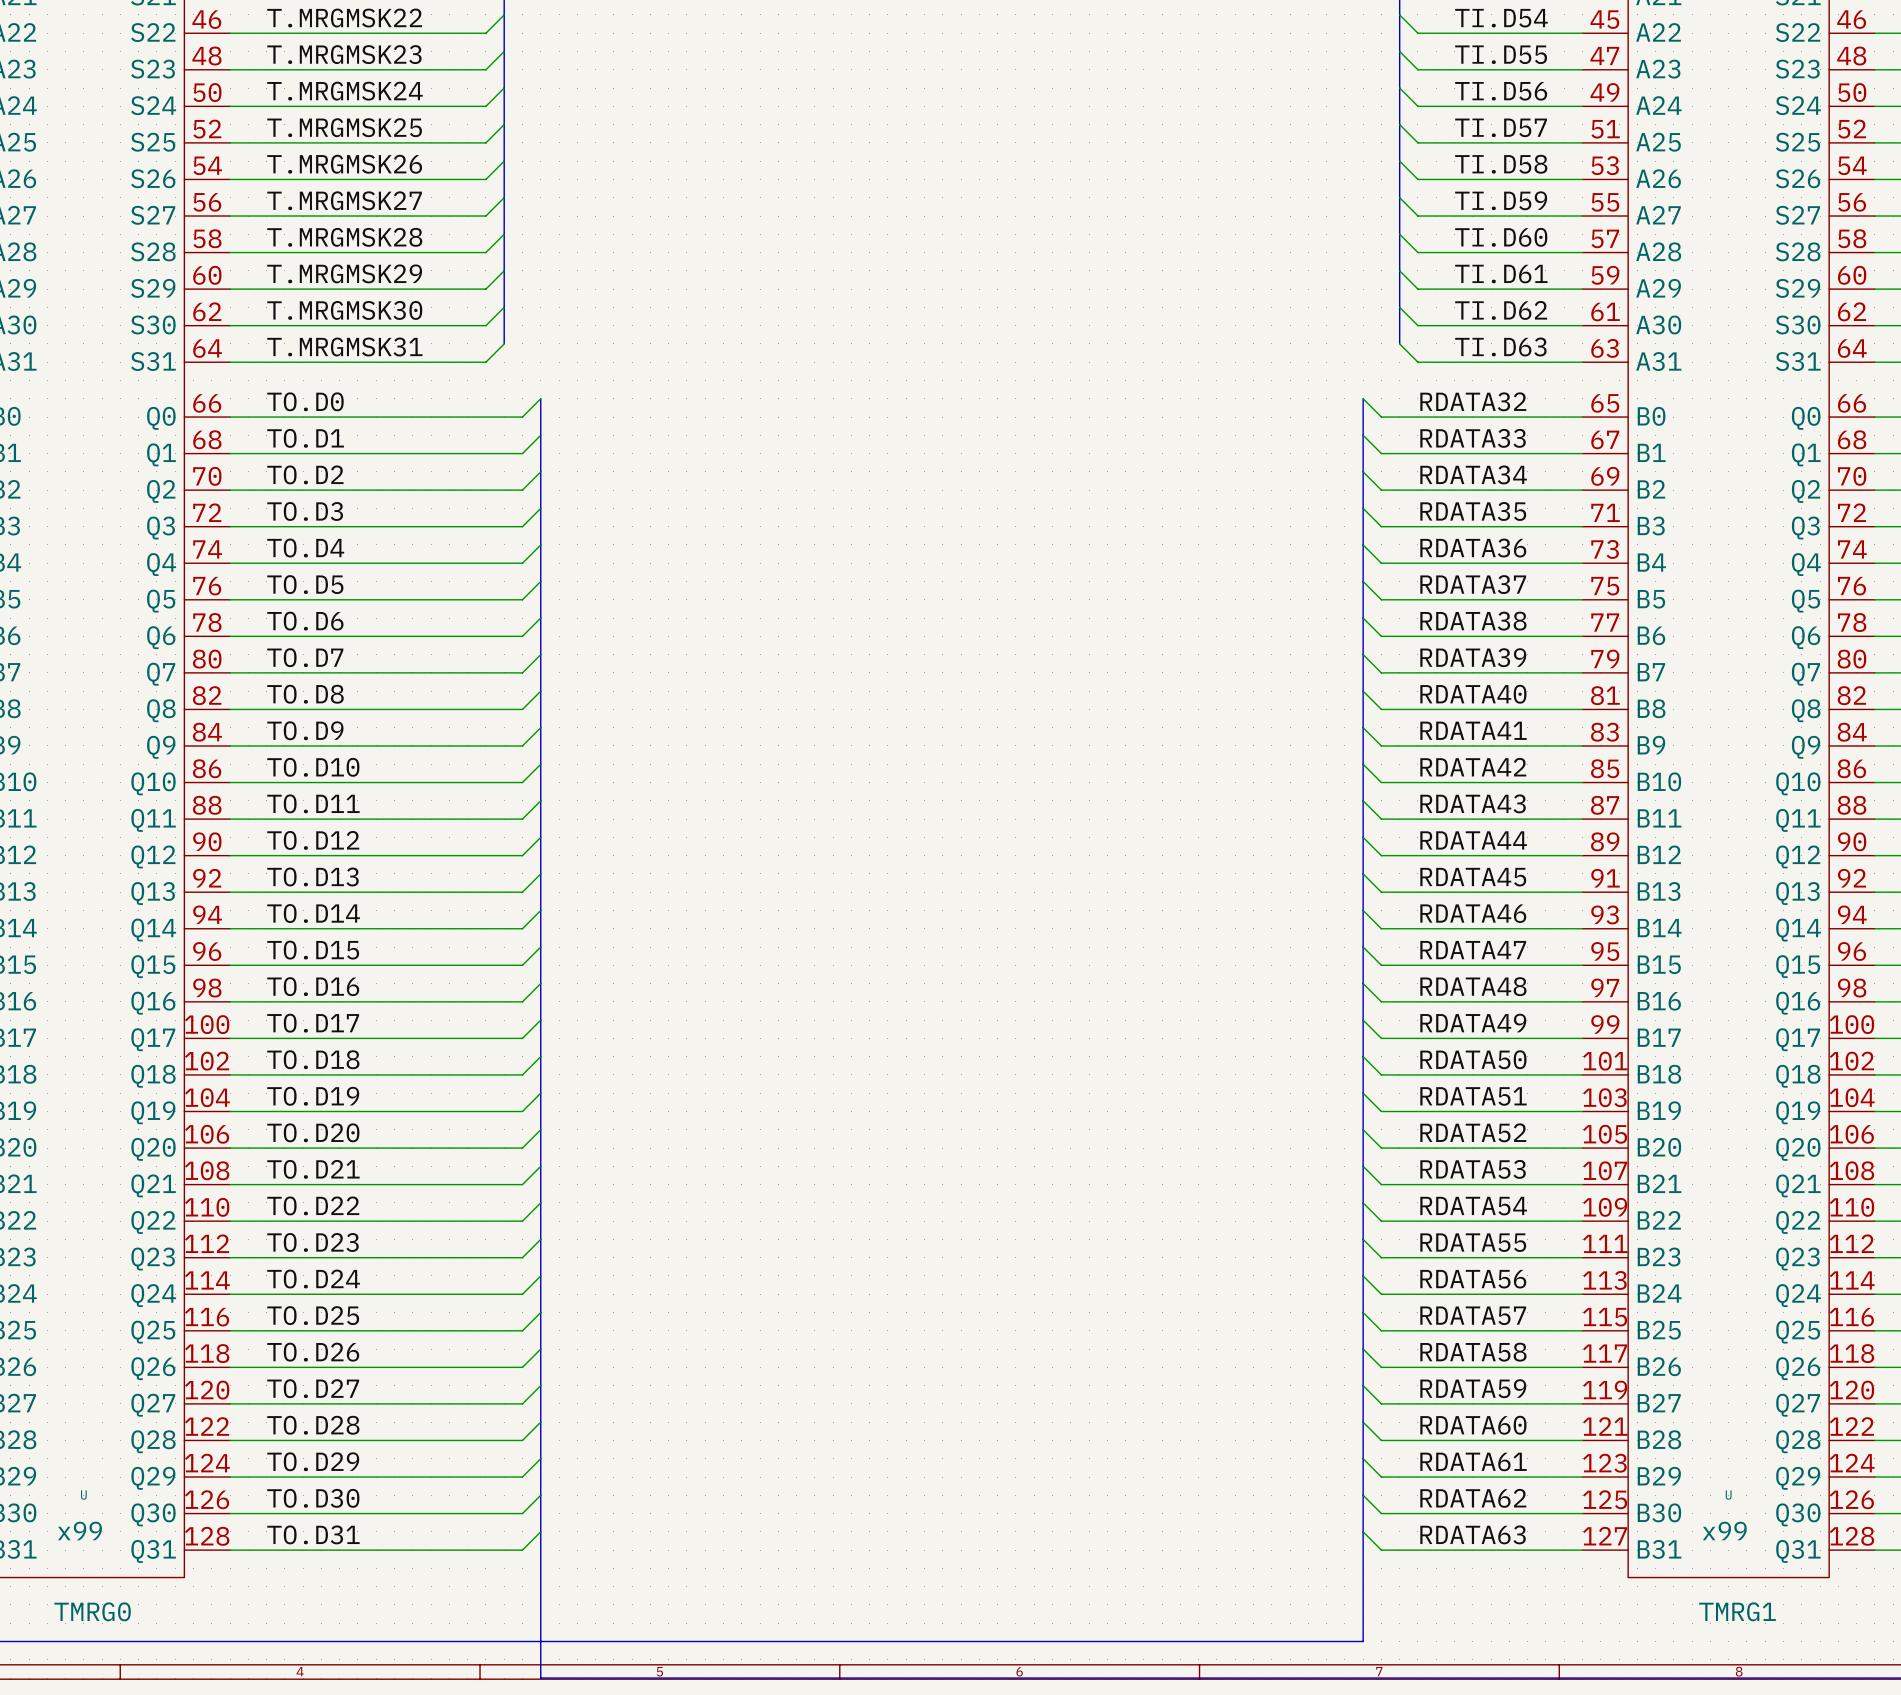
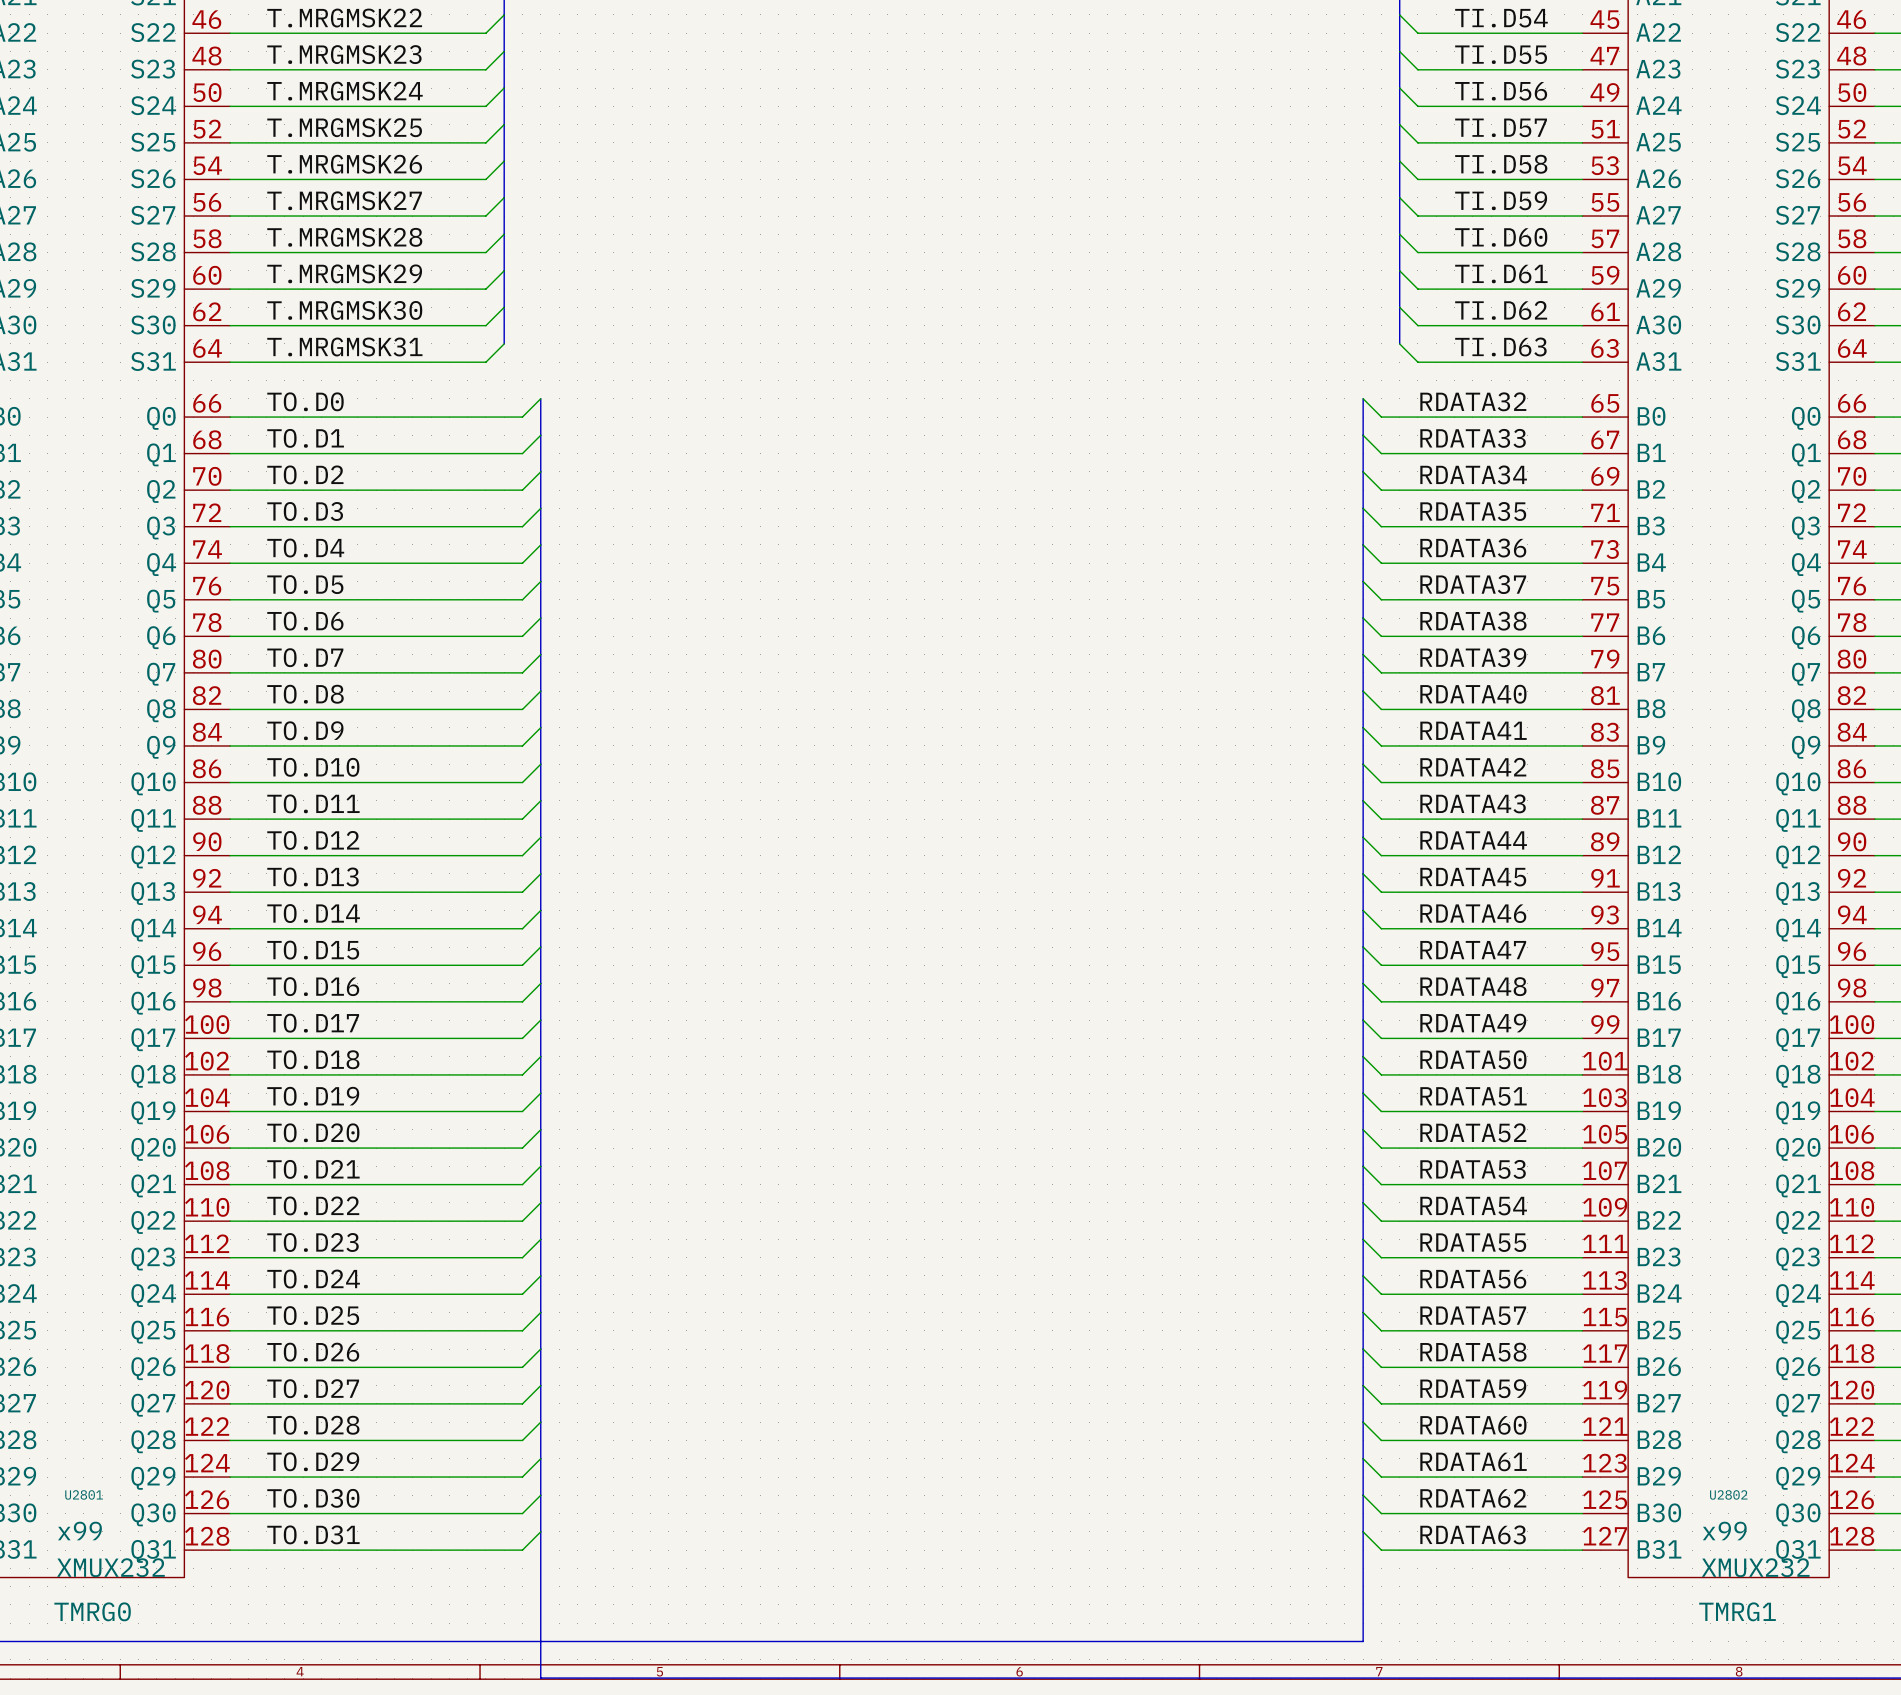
U name: U (83, 1495) -> U2801 (84, 1494)
U name: U (1728, 1495) -> U2802 (1728, 1494)
U value: none -> XMUX232 (110, 1567)
U value: none -> XMUX232 (1755, 1567)

